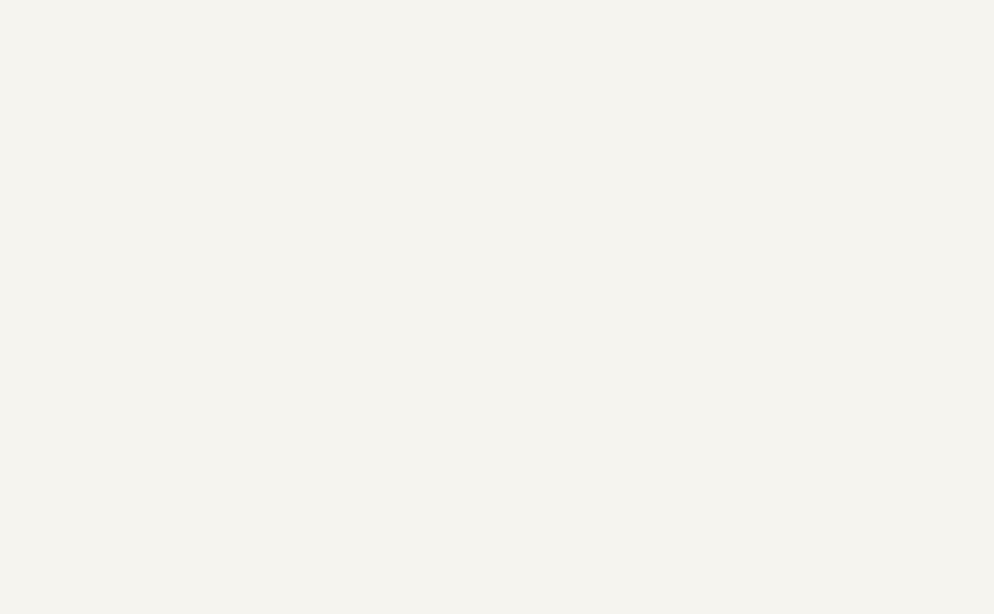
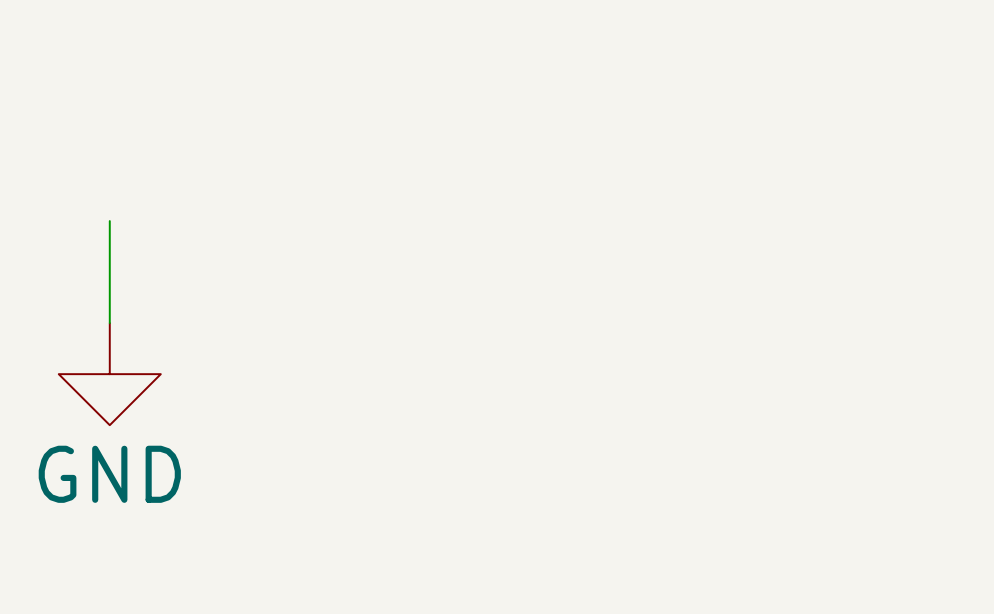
wire: none -> (109, 221) (109, 323)
power symbol: none -> GND (109, 374)

